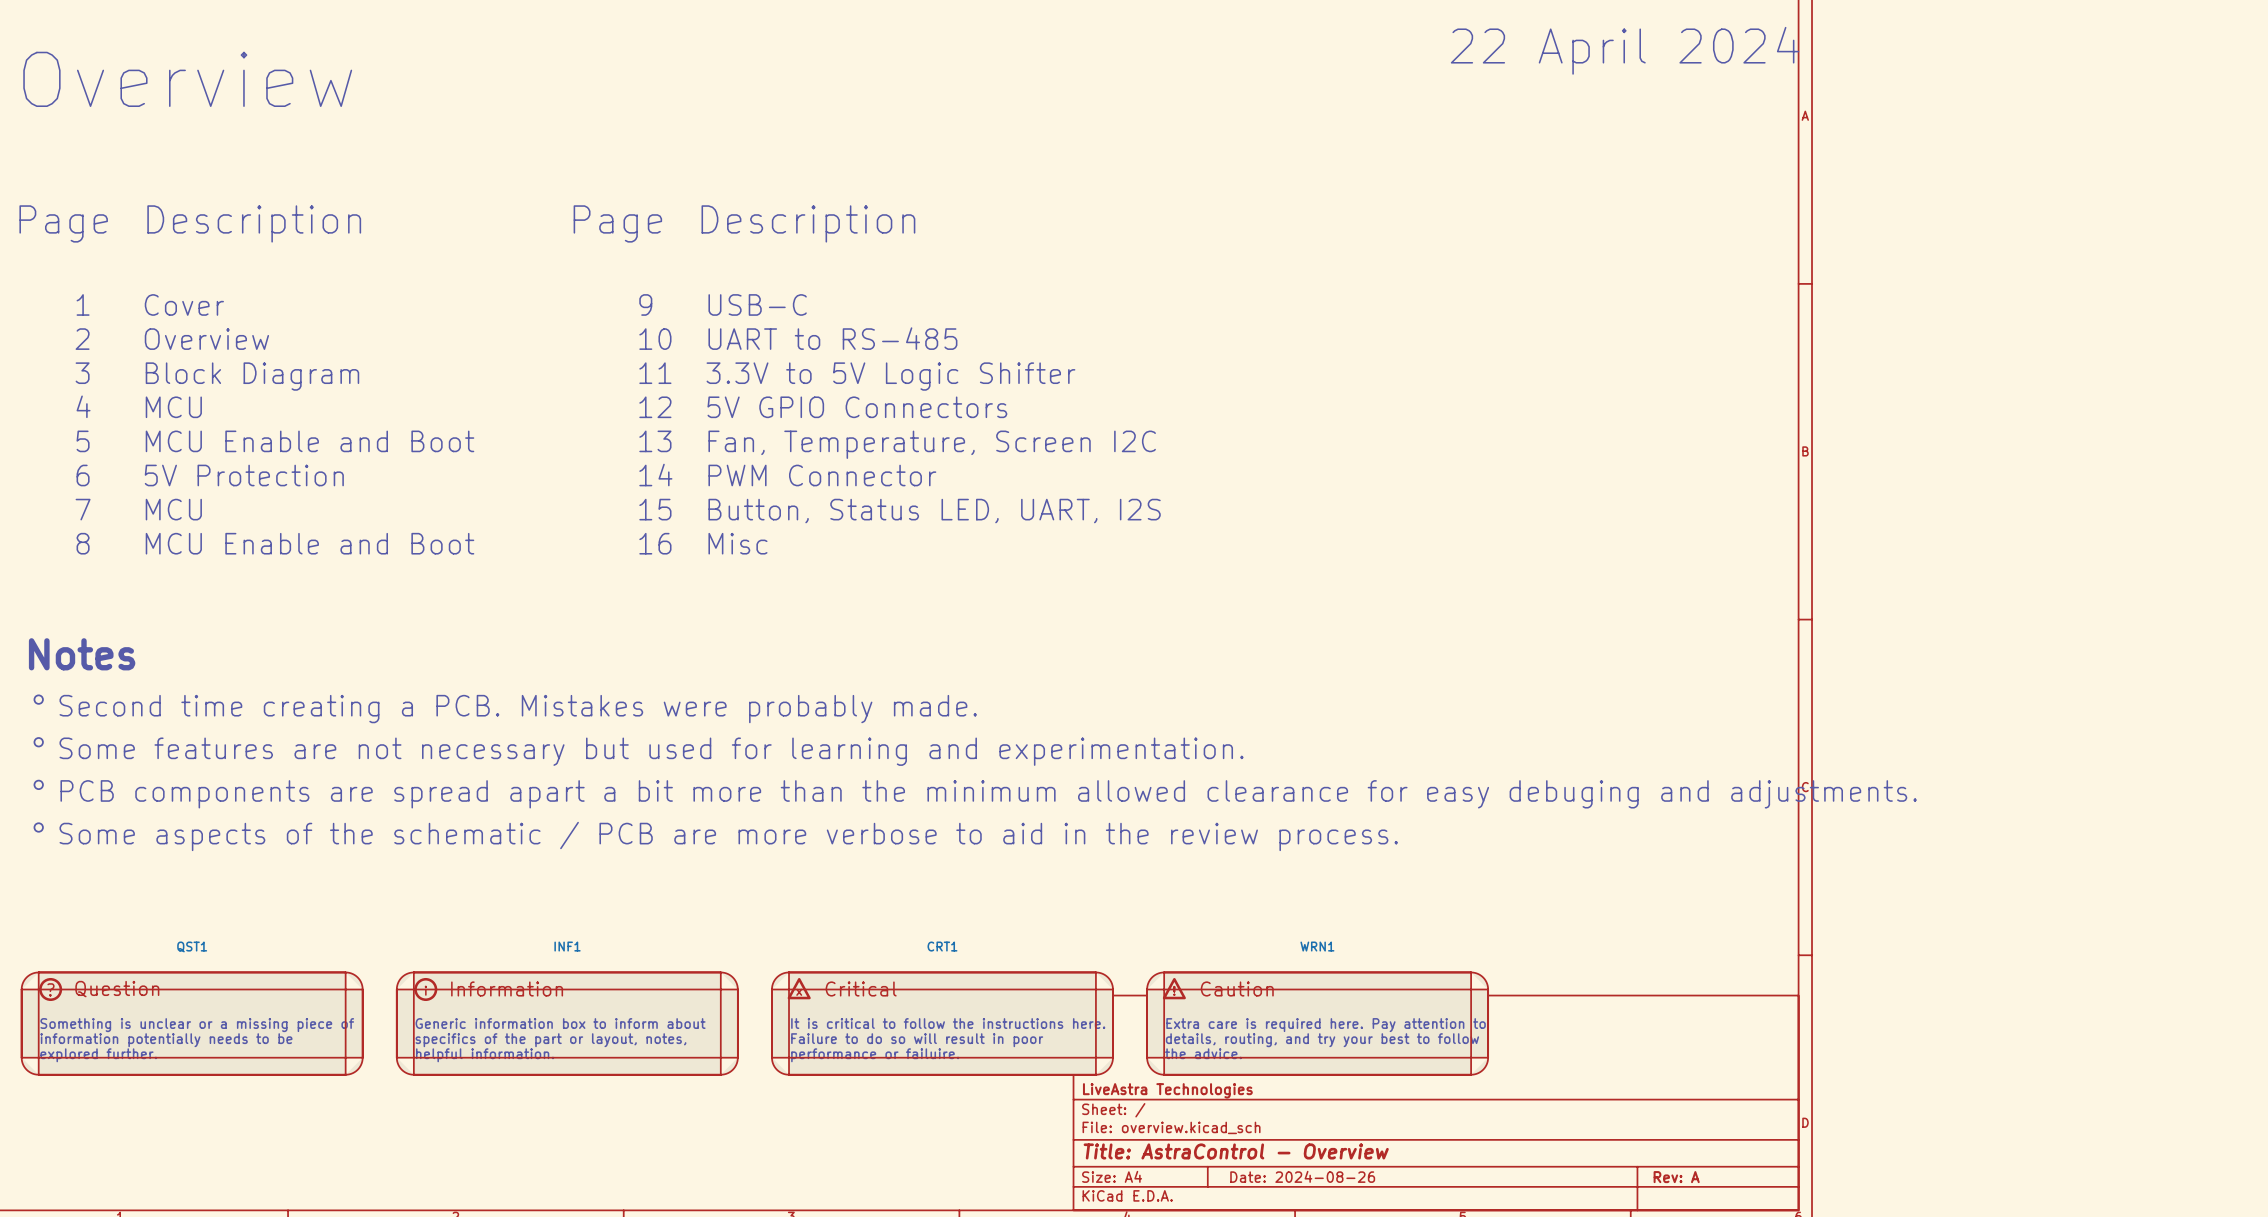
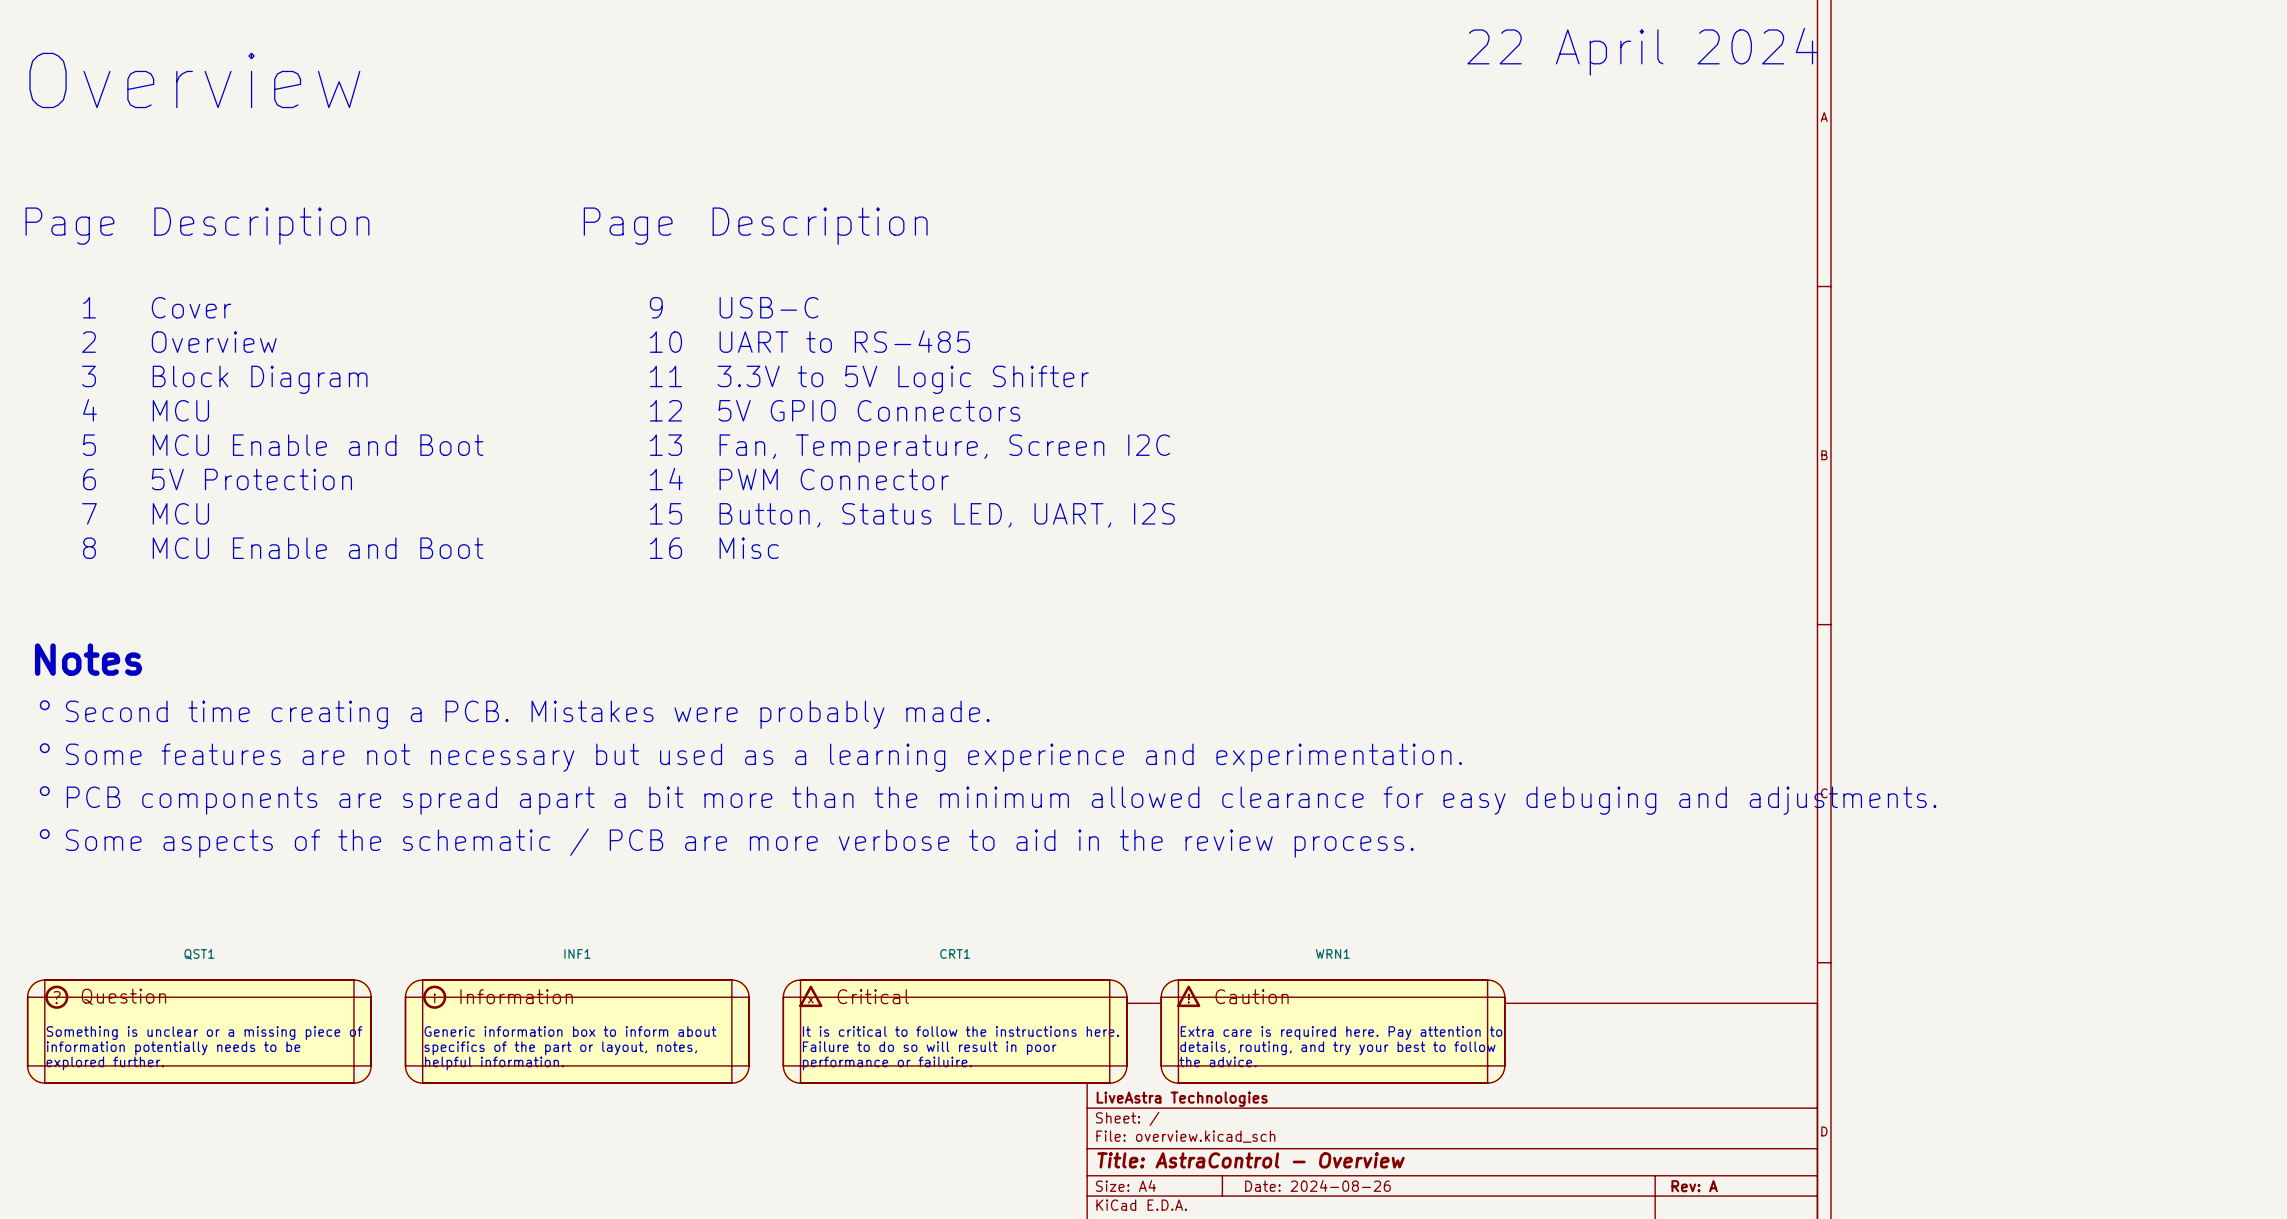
text: Some features are not necessary but used for learning and experimentation. (651, 751) -> Some features are not necessary but used as a learning experience and experimentation. (763, 757)

